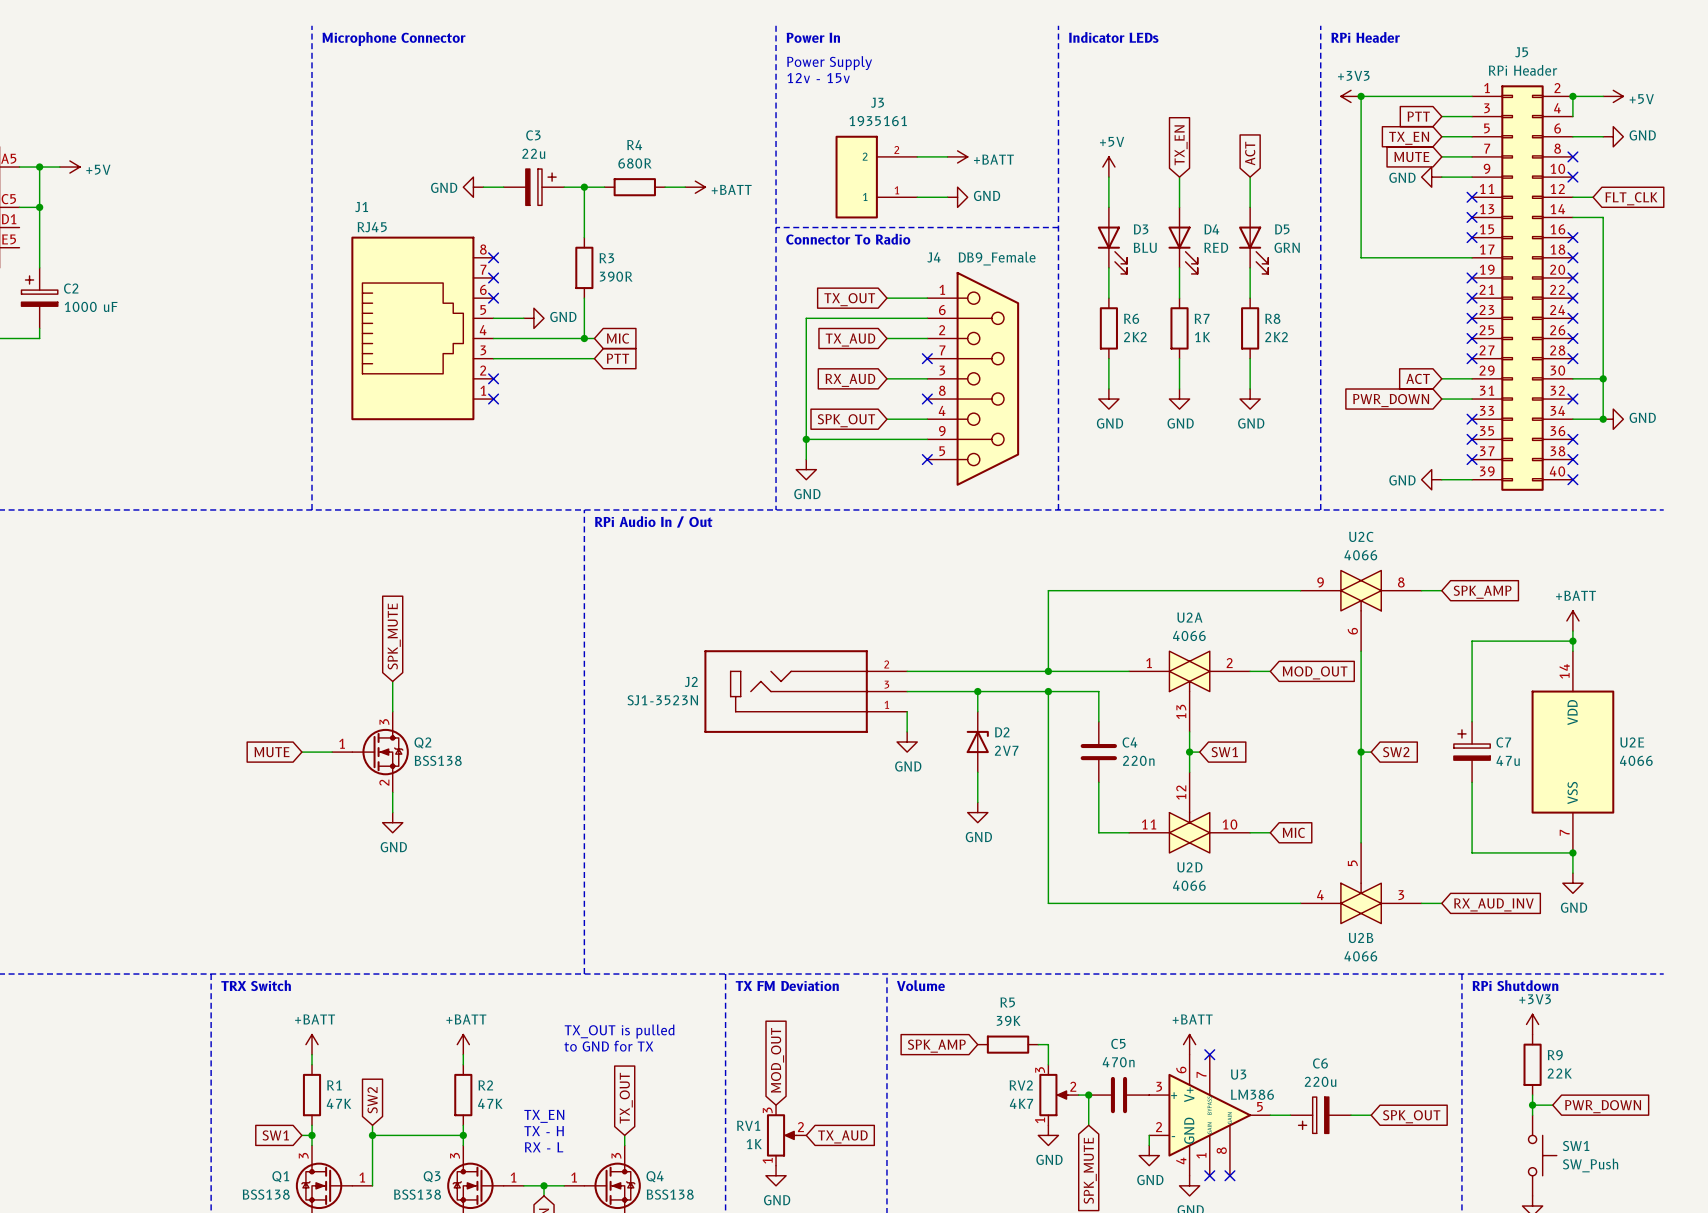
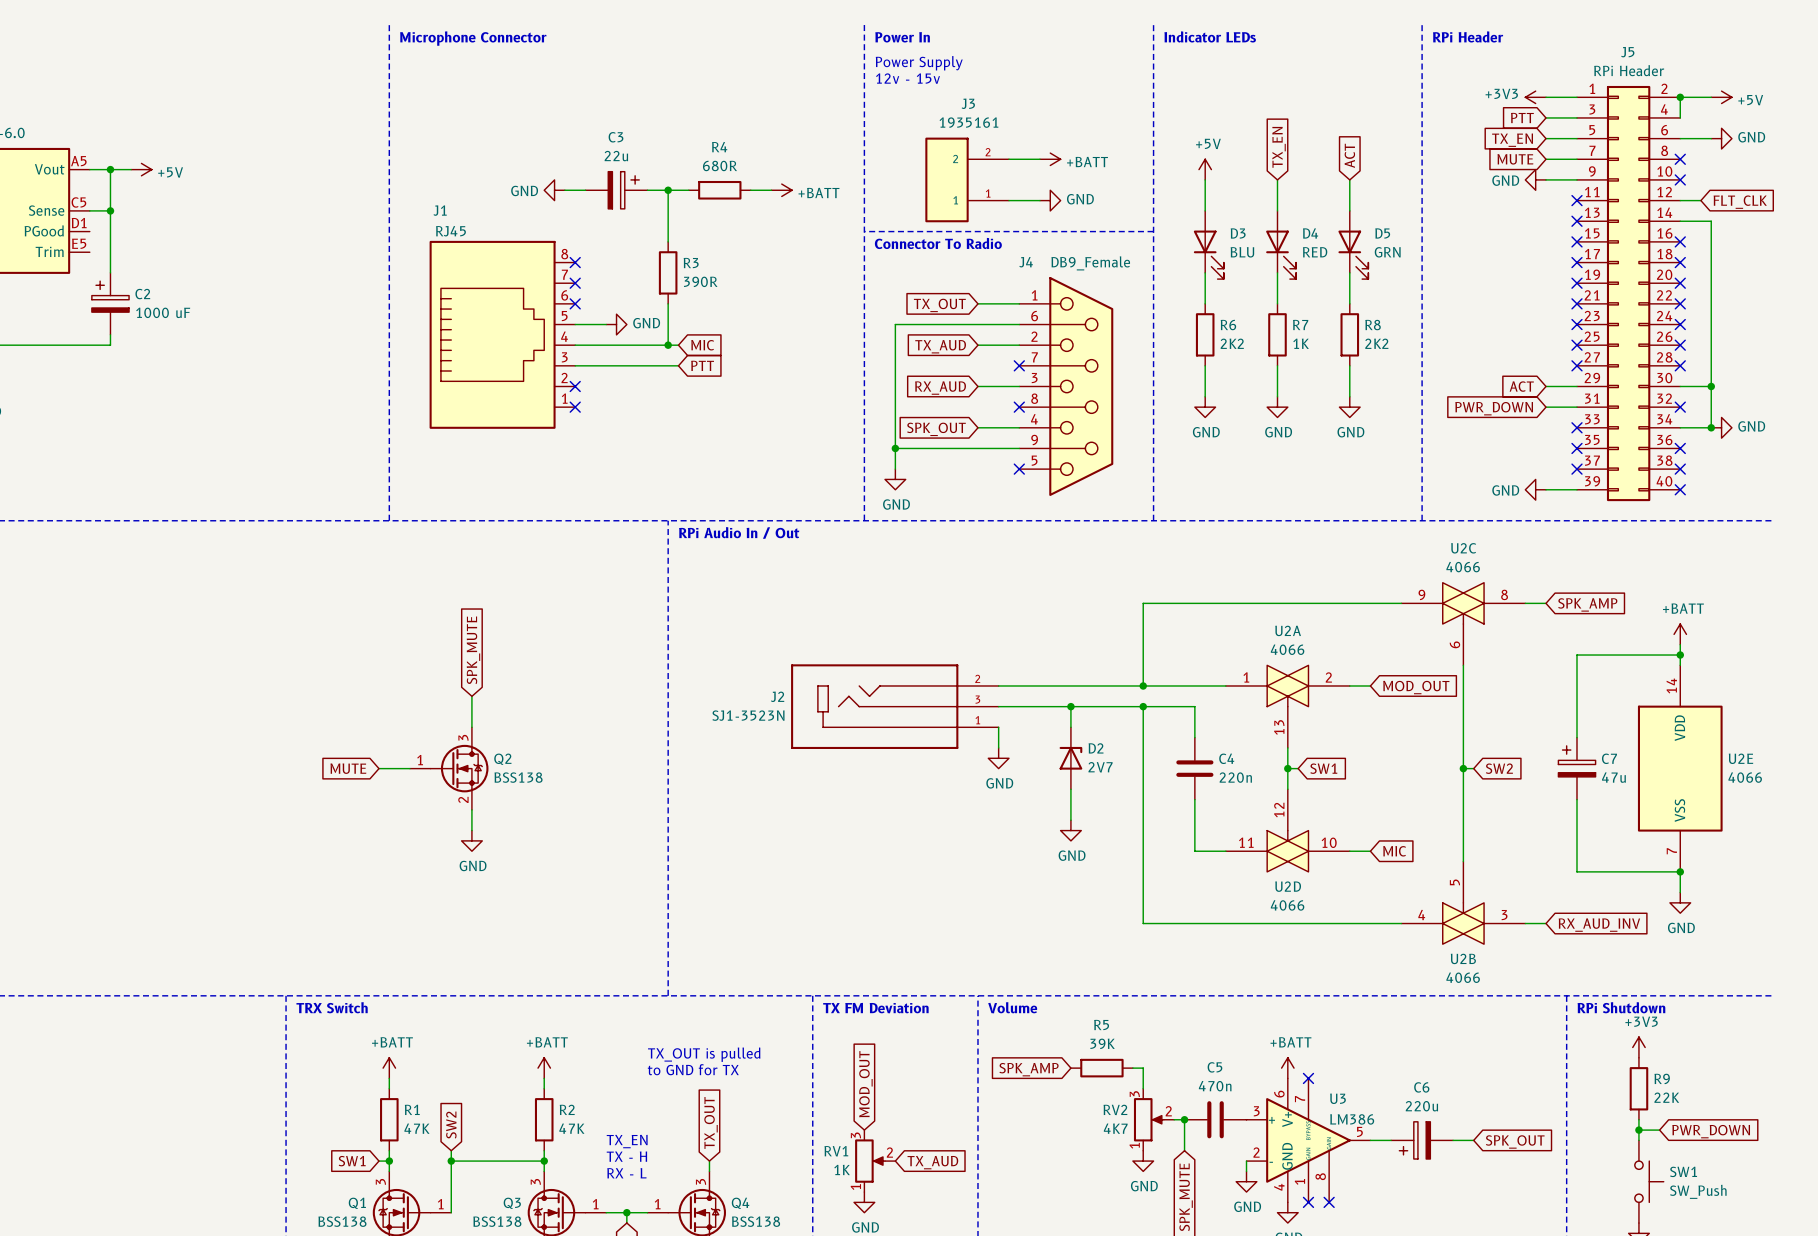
power symbol text position: +3V3 (1353, 75) -> +3V3 (1501, 93)
power symbol position: +3V3 (1351, 96) -> +3V3 (1535, 97)
junction: (1361, 96) -> none
wire: (1441, 96) (1361, 96) (1361, 257) (1472, 257) -> none
no-connect mark: none -> (1576, 262)

